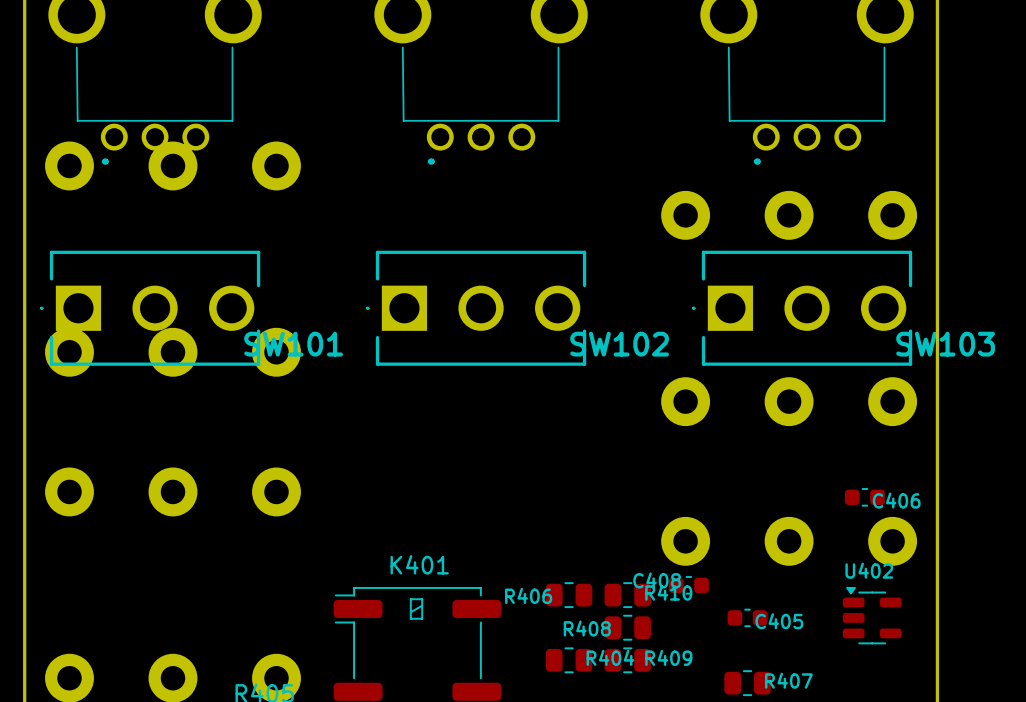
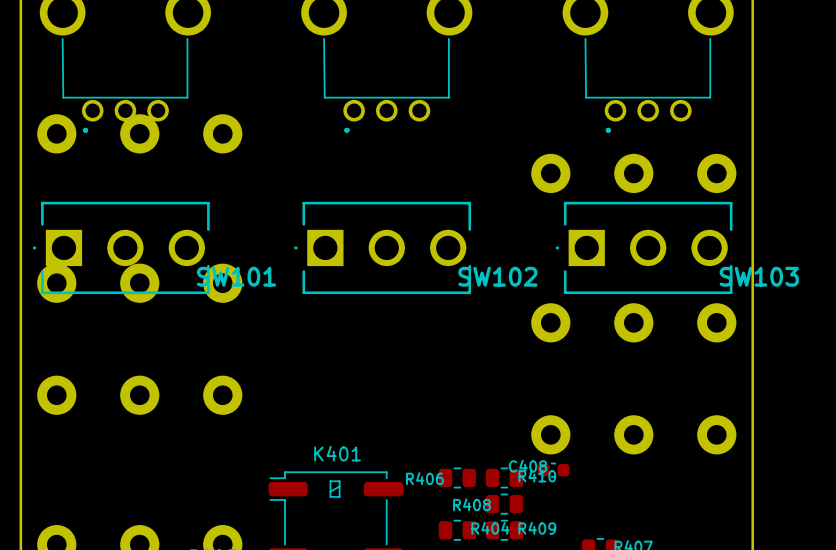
C406: (864, 497) -> none
U402: (872, 615) -> none
C405: (747, 617) -> none

